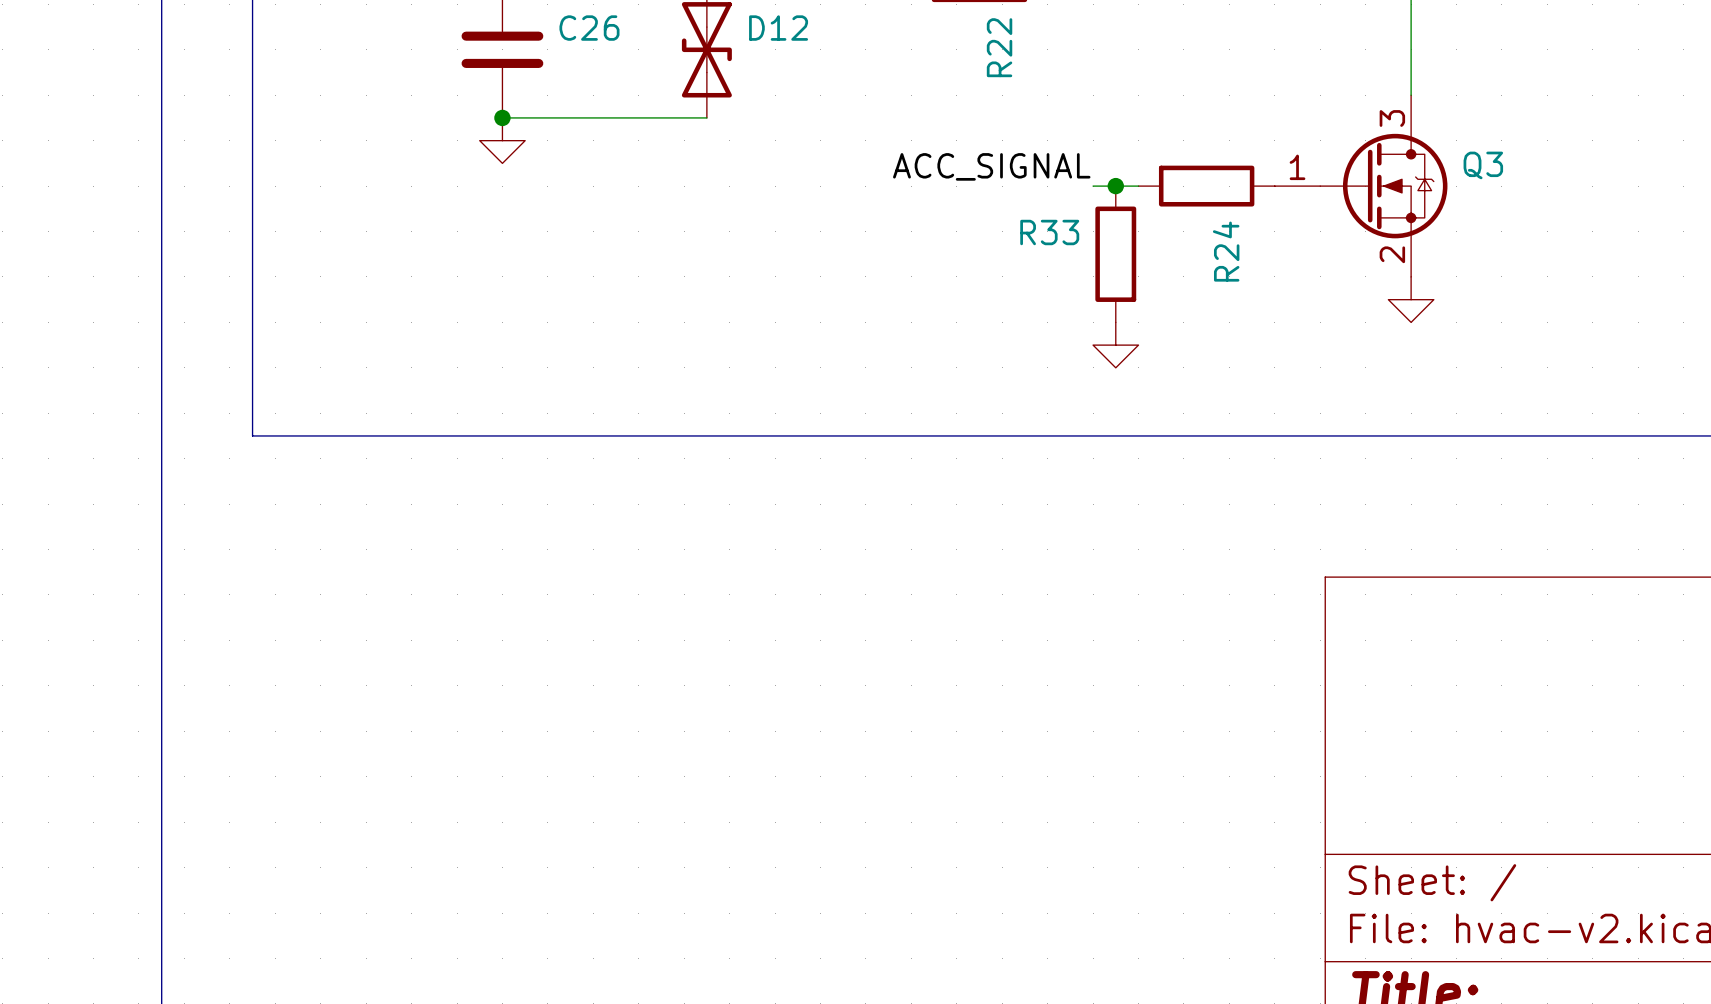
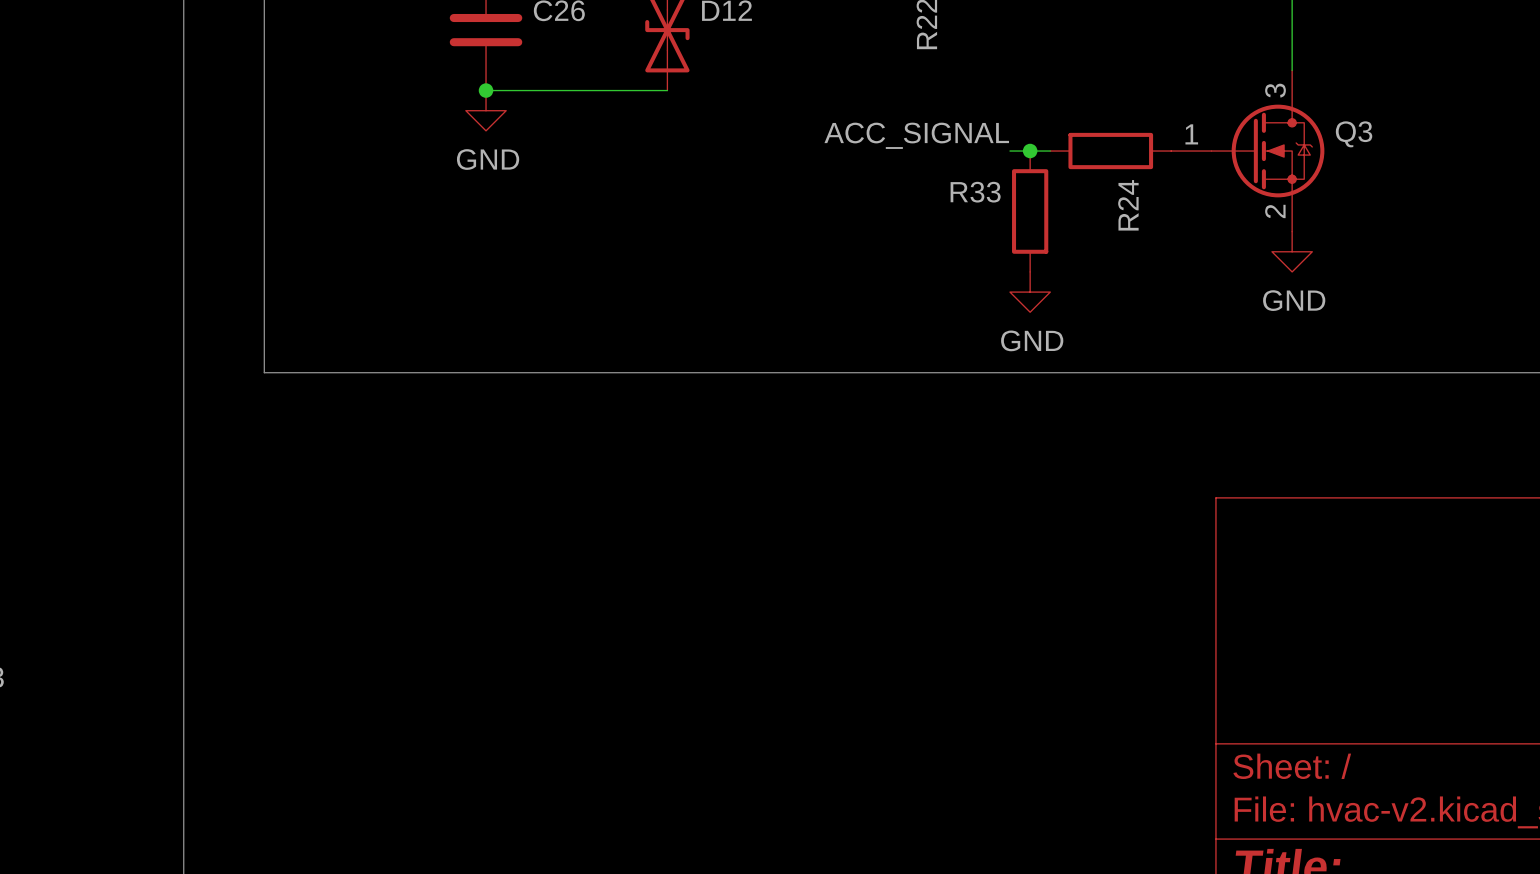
power symbol text: none -> GND (488, 159)
power symbol text: none -> GND (1294, 300)
power symbol text: none -> GND (1032, 340)

